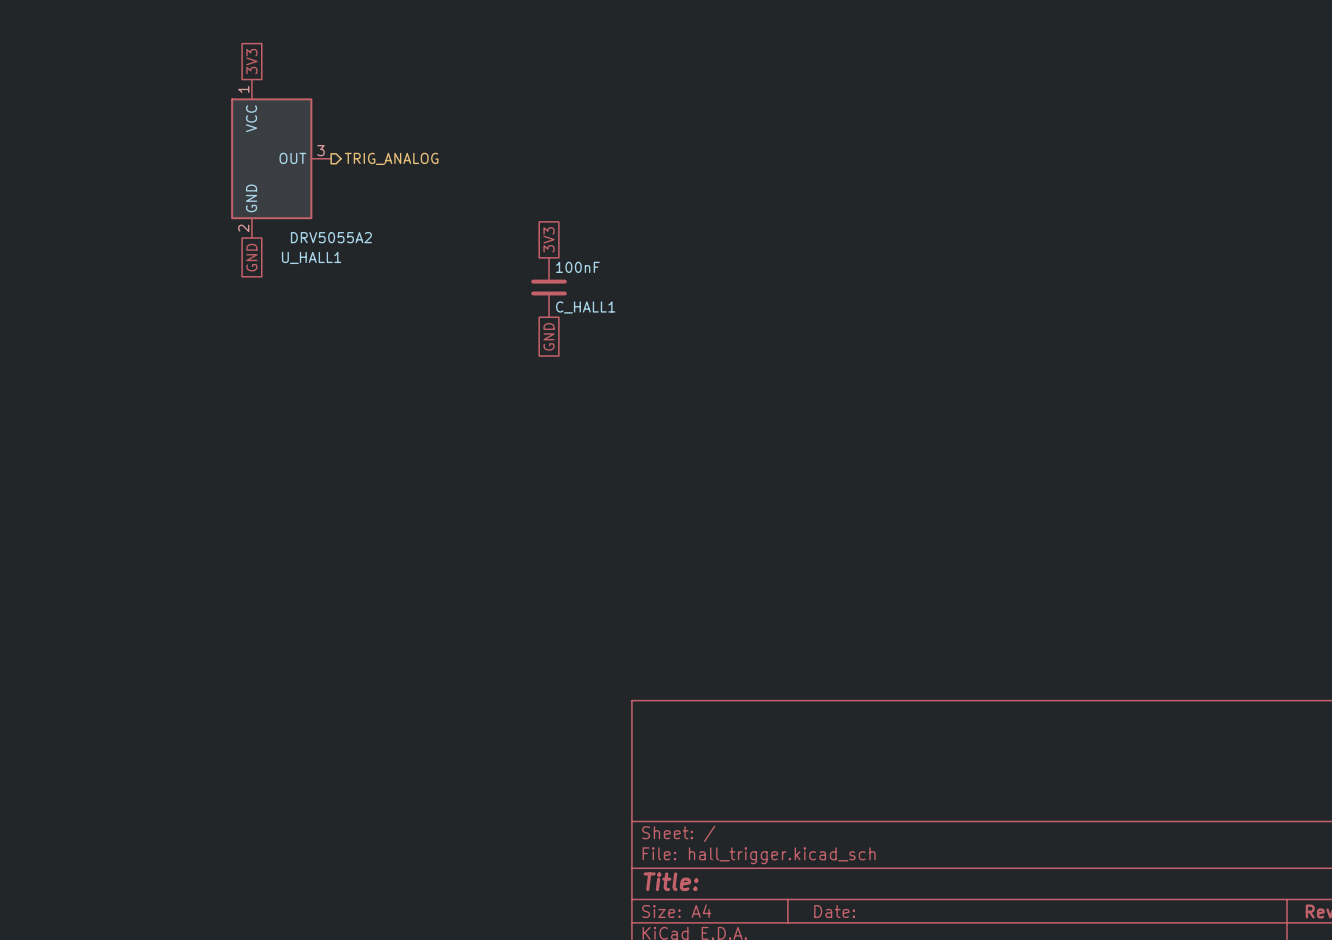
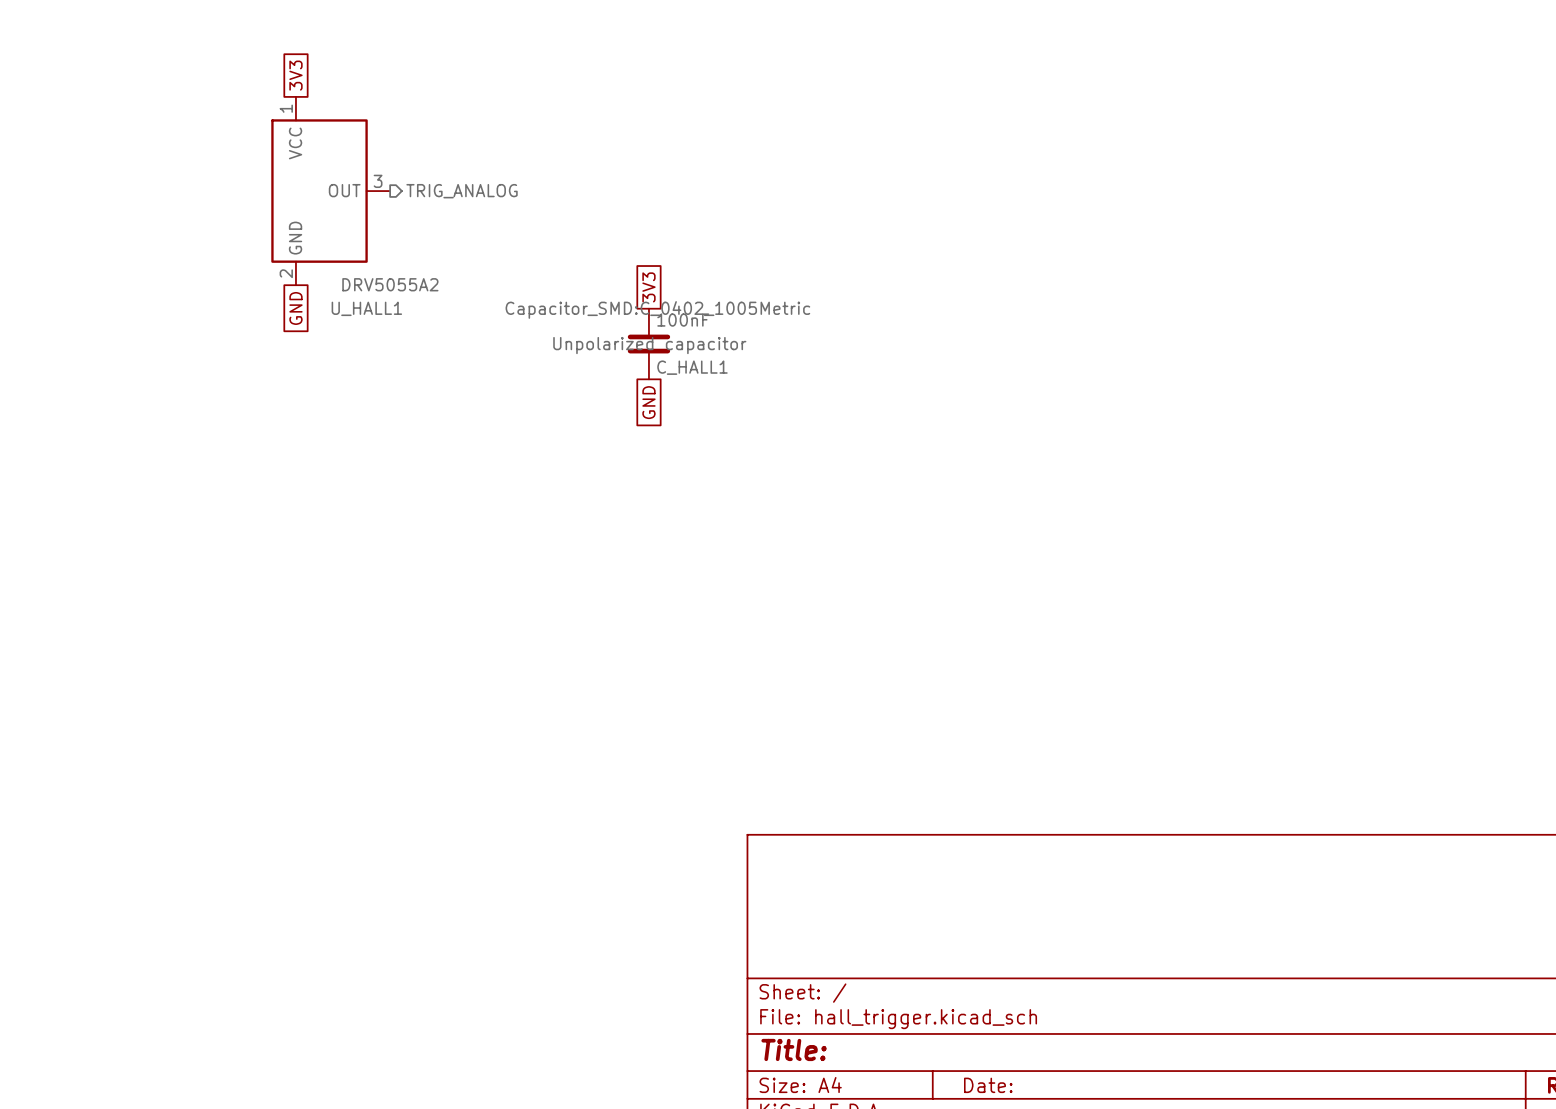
C_HALL1 text: none -> Capacitor_SMD:C_0402_1005Metric (657, 309)
C_HALL1 text: none -> Unpolarized capacitor (649, 345)

